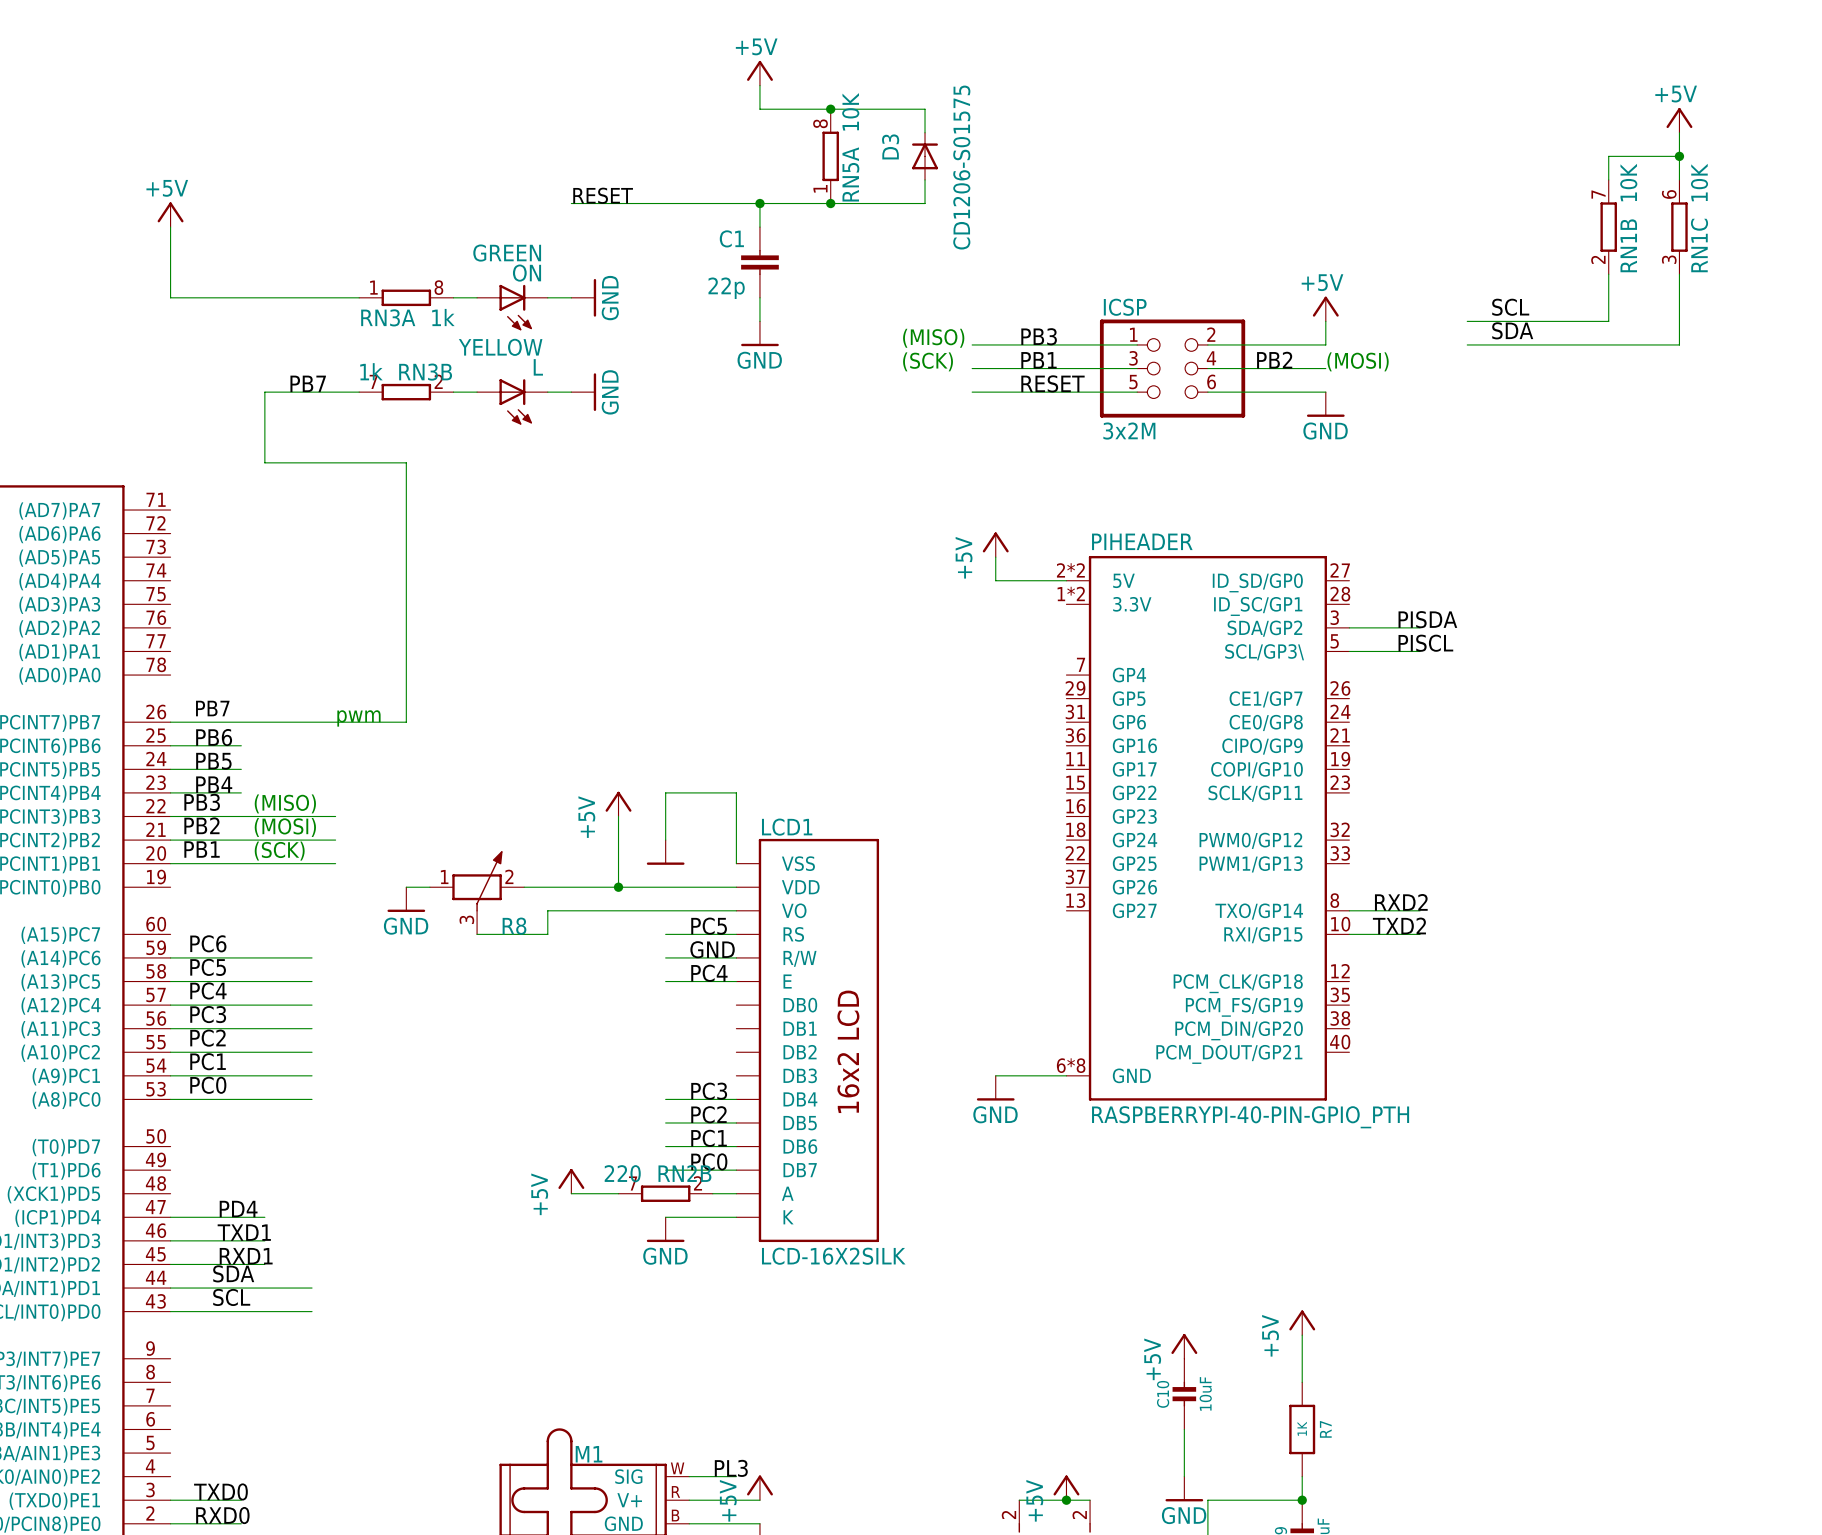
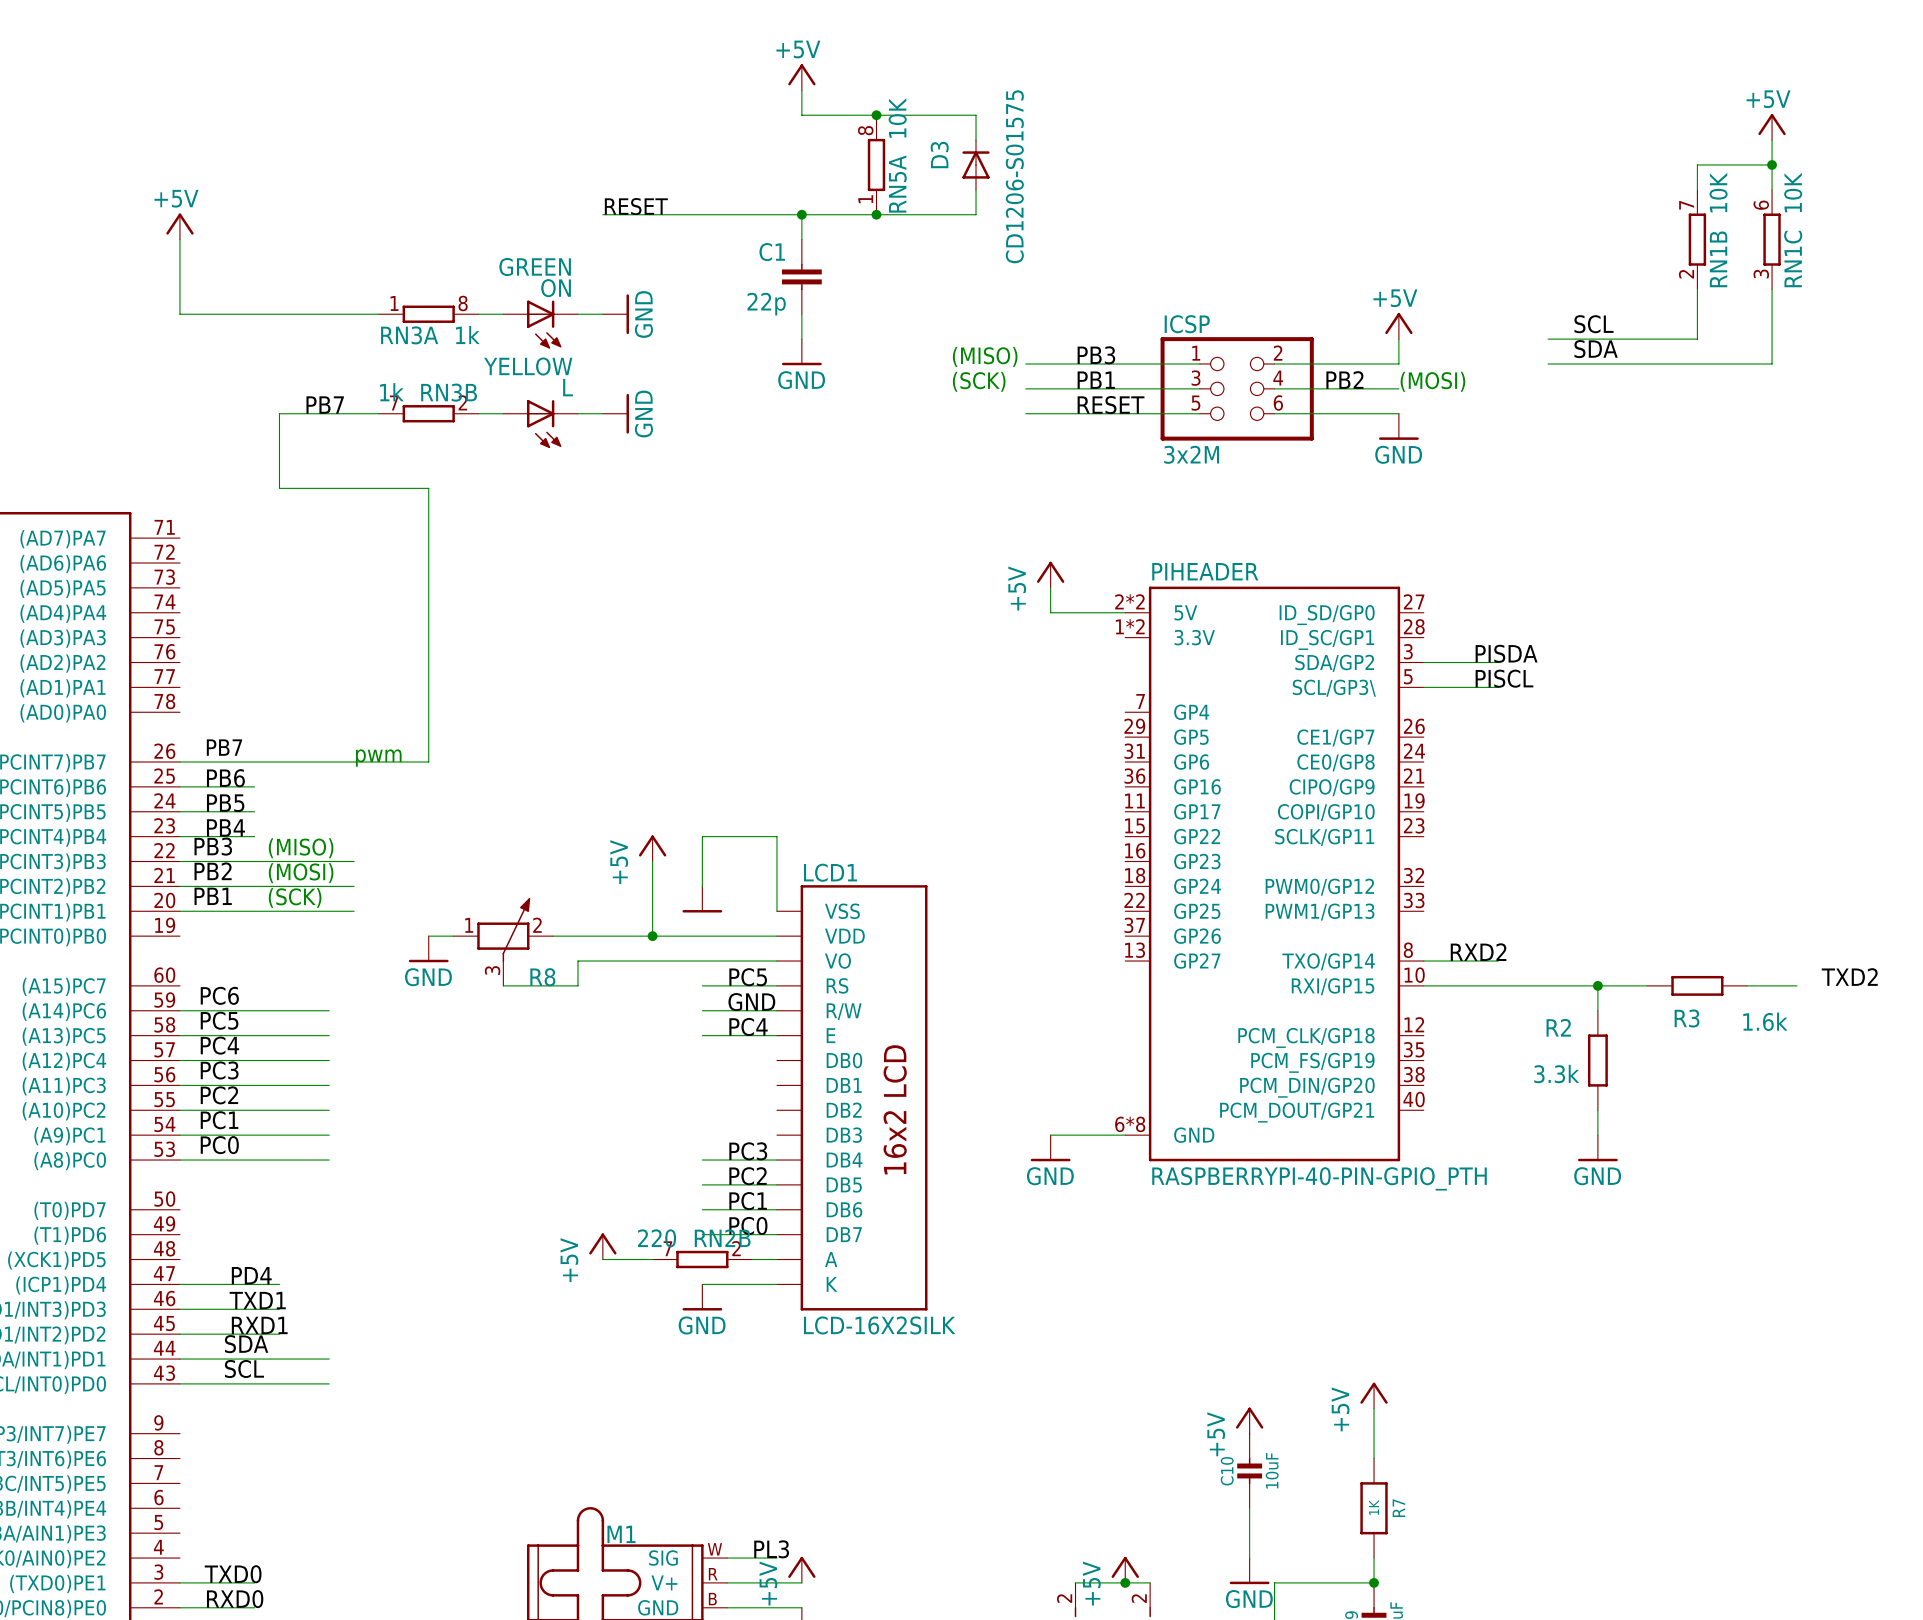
label: TXD2 (1399, 925) -> none
label: none -> TXD2 (1849, 977)
wire: none -> (1498, 985) (1647, 985)
wire: none -> (1597, 985) (1597, 1010)
junction: none -> (1597, 985)
R3: none -> 1.6k (1697, 985)
wire: none -> (1747, 985) (1796, 985)
R2: none -> 3.3k (1597, 1060)
wire: none -> (1597, 1110) (1597, 1135)
power symbol: none -> GND (1597, 1148)

